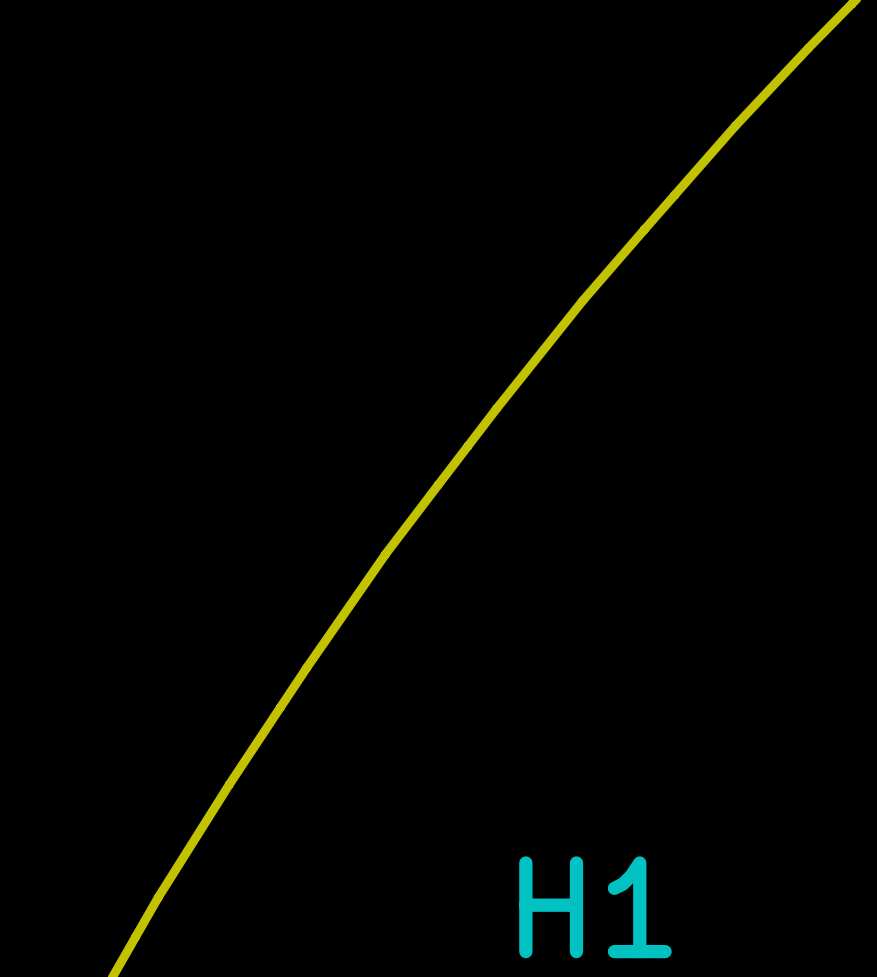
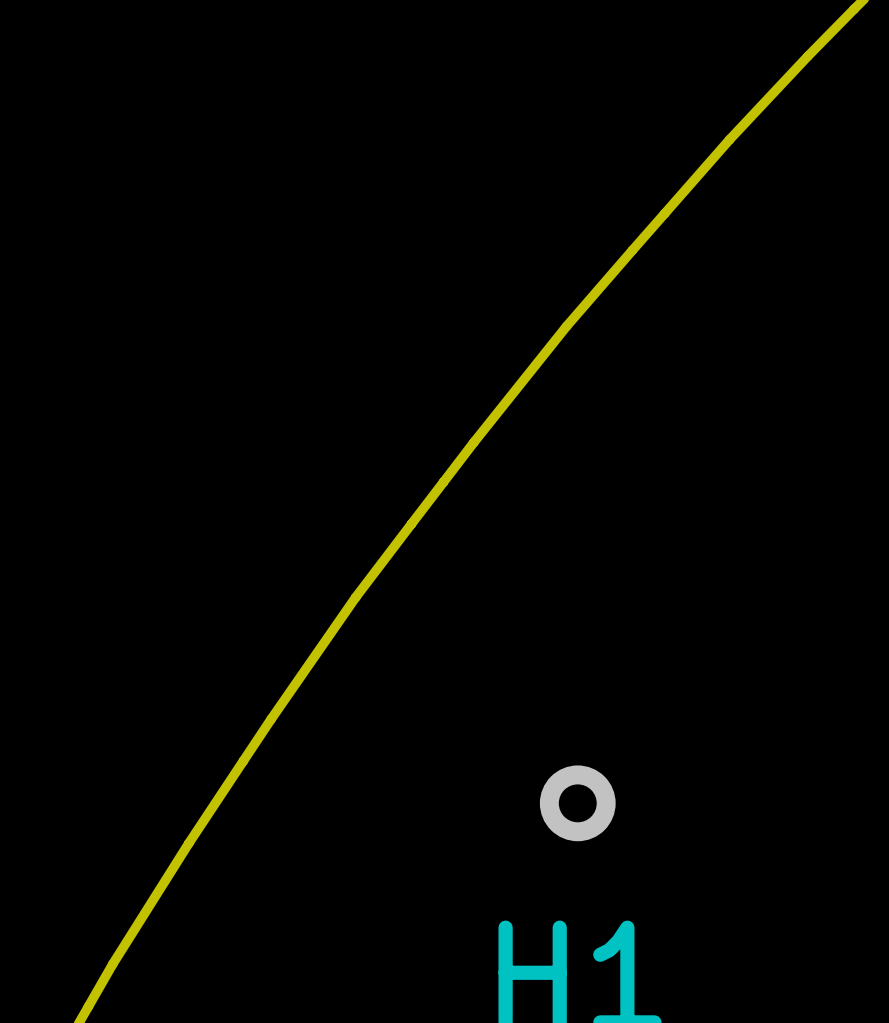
via: none -> (577, 803)

